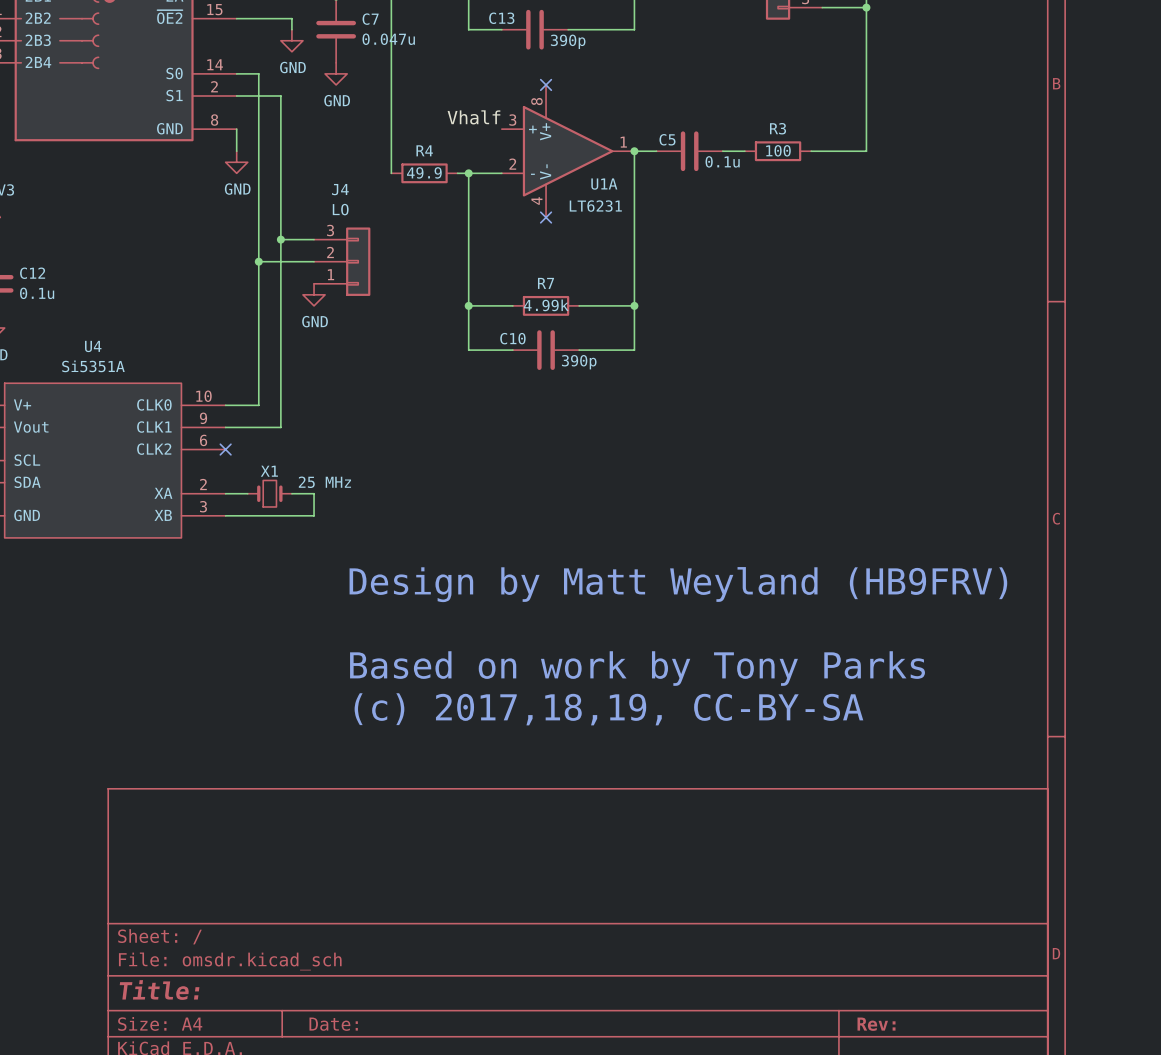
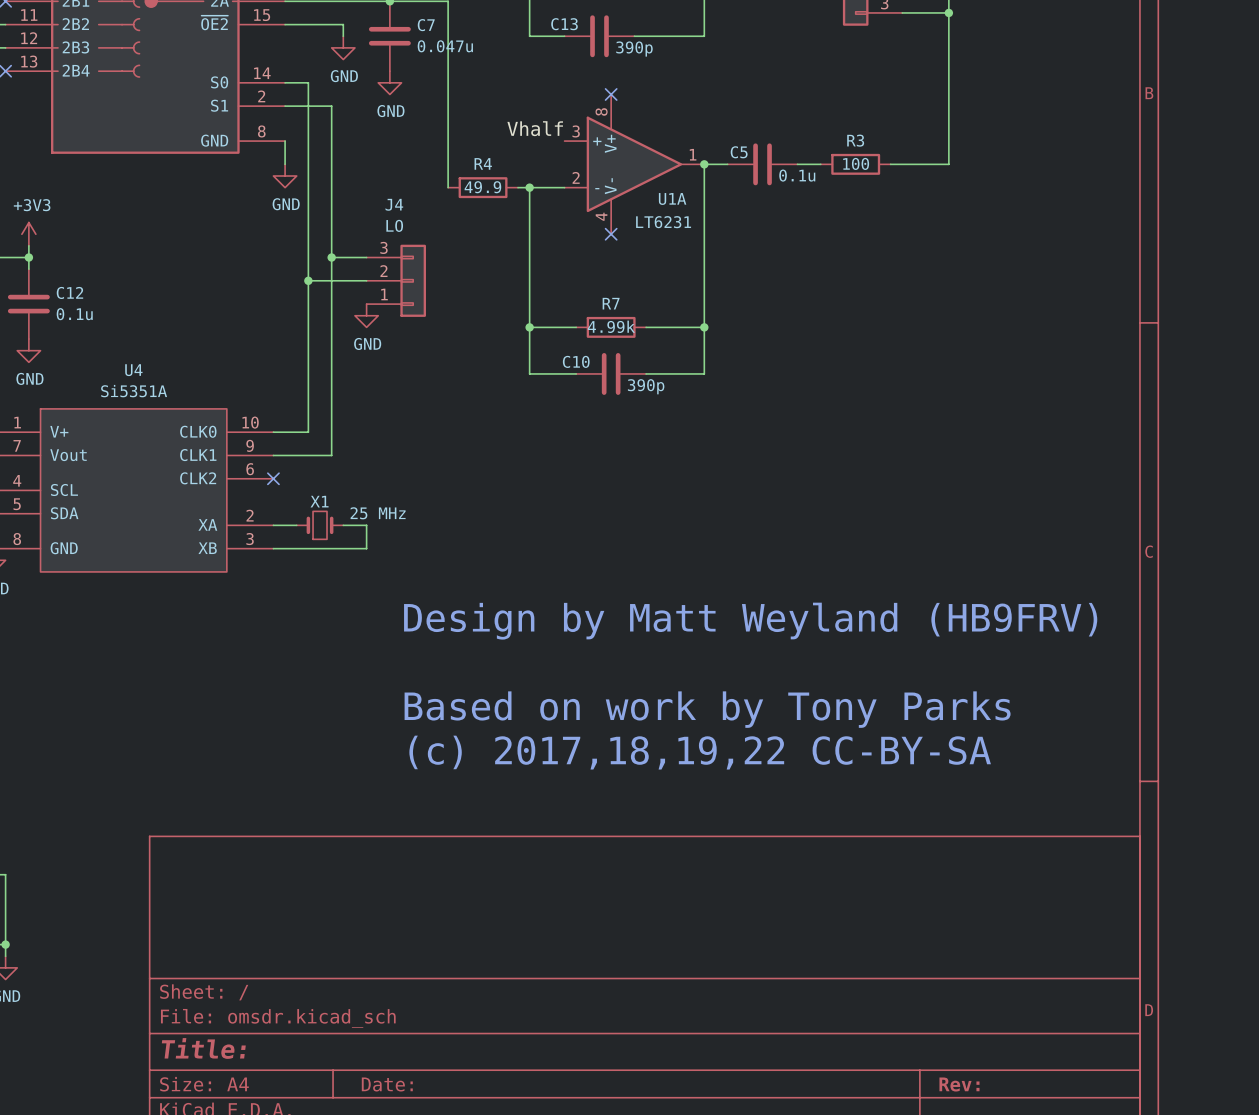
text: (c) 2017,18,19, CC-BY-SA (608, 709) -> (c) 2017,18,19,22 CC-BY-SA (700, 752)

